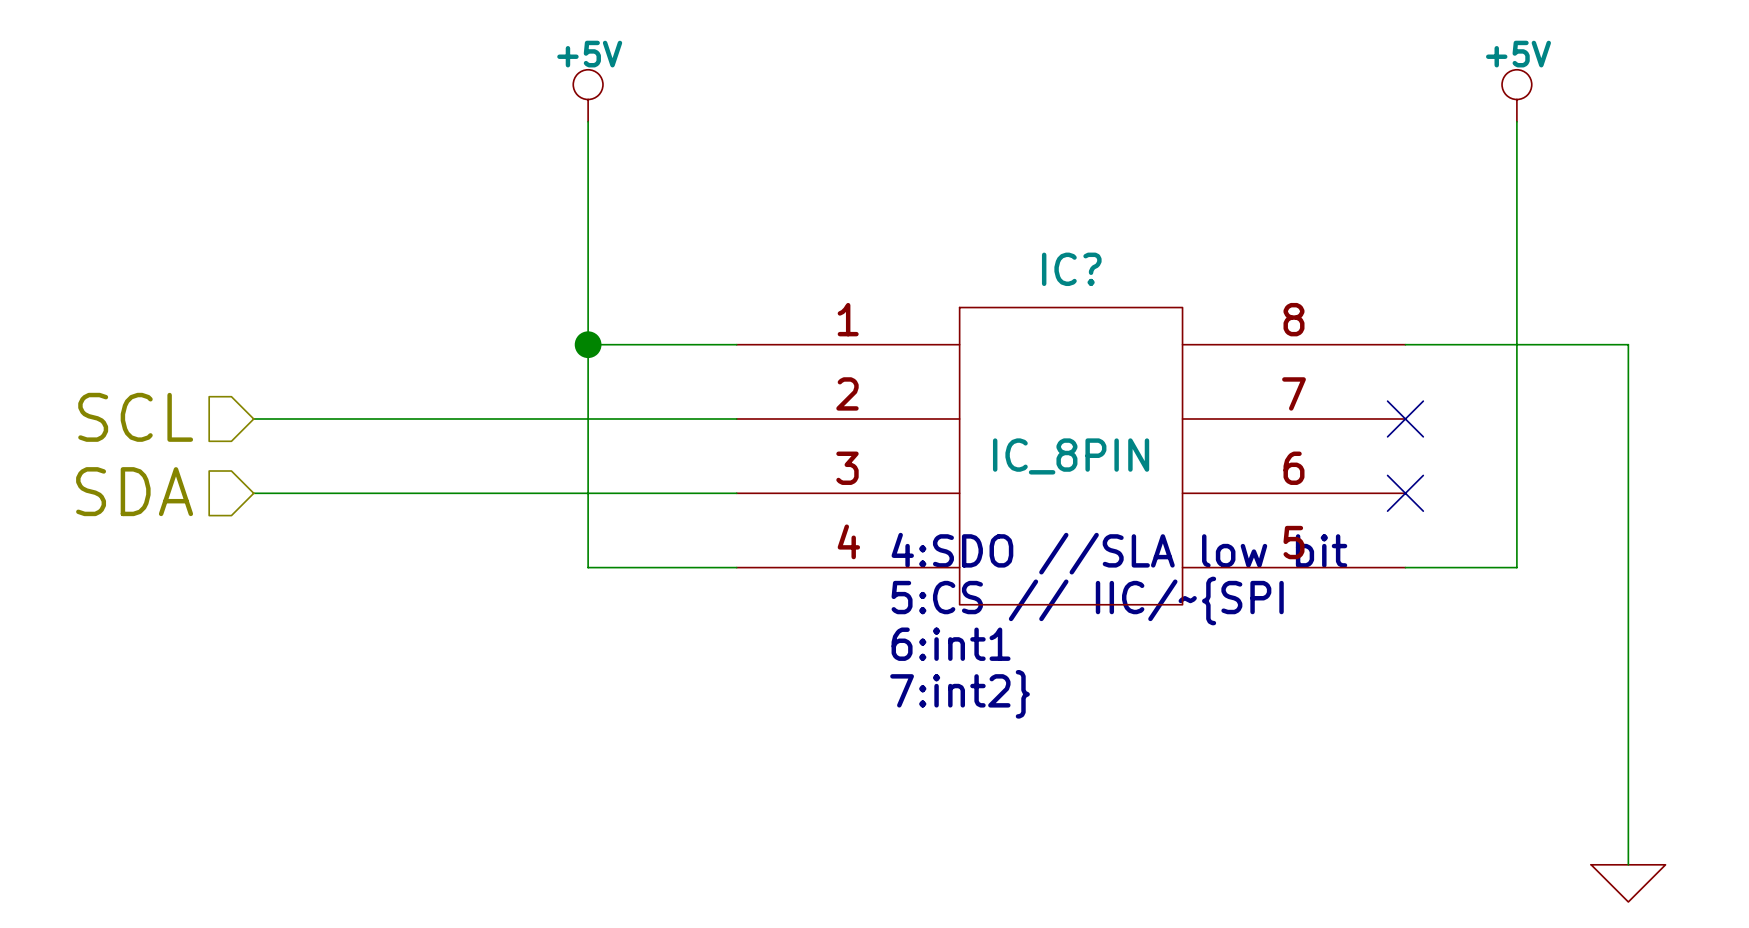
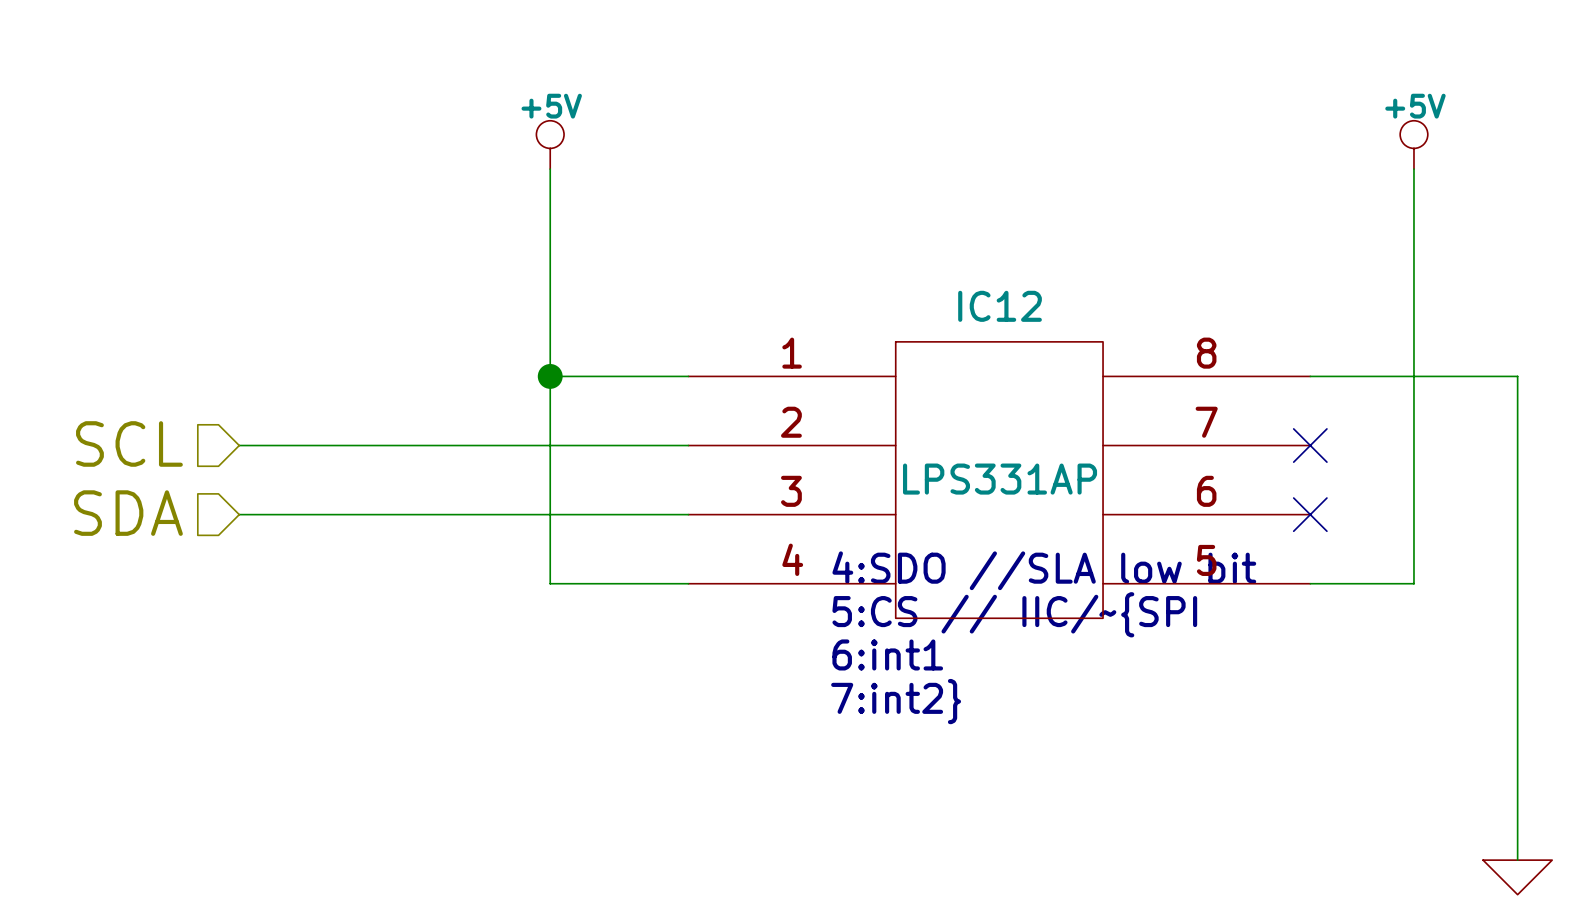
IC? name: IC? (1071, 269) -> IC12 (1000, 306)
IC? value: IC_8PIN (1071, 456) -> LPS331AP (1000, 479)

